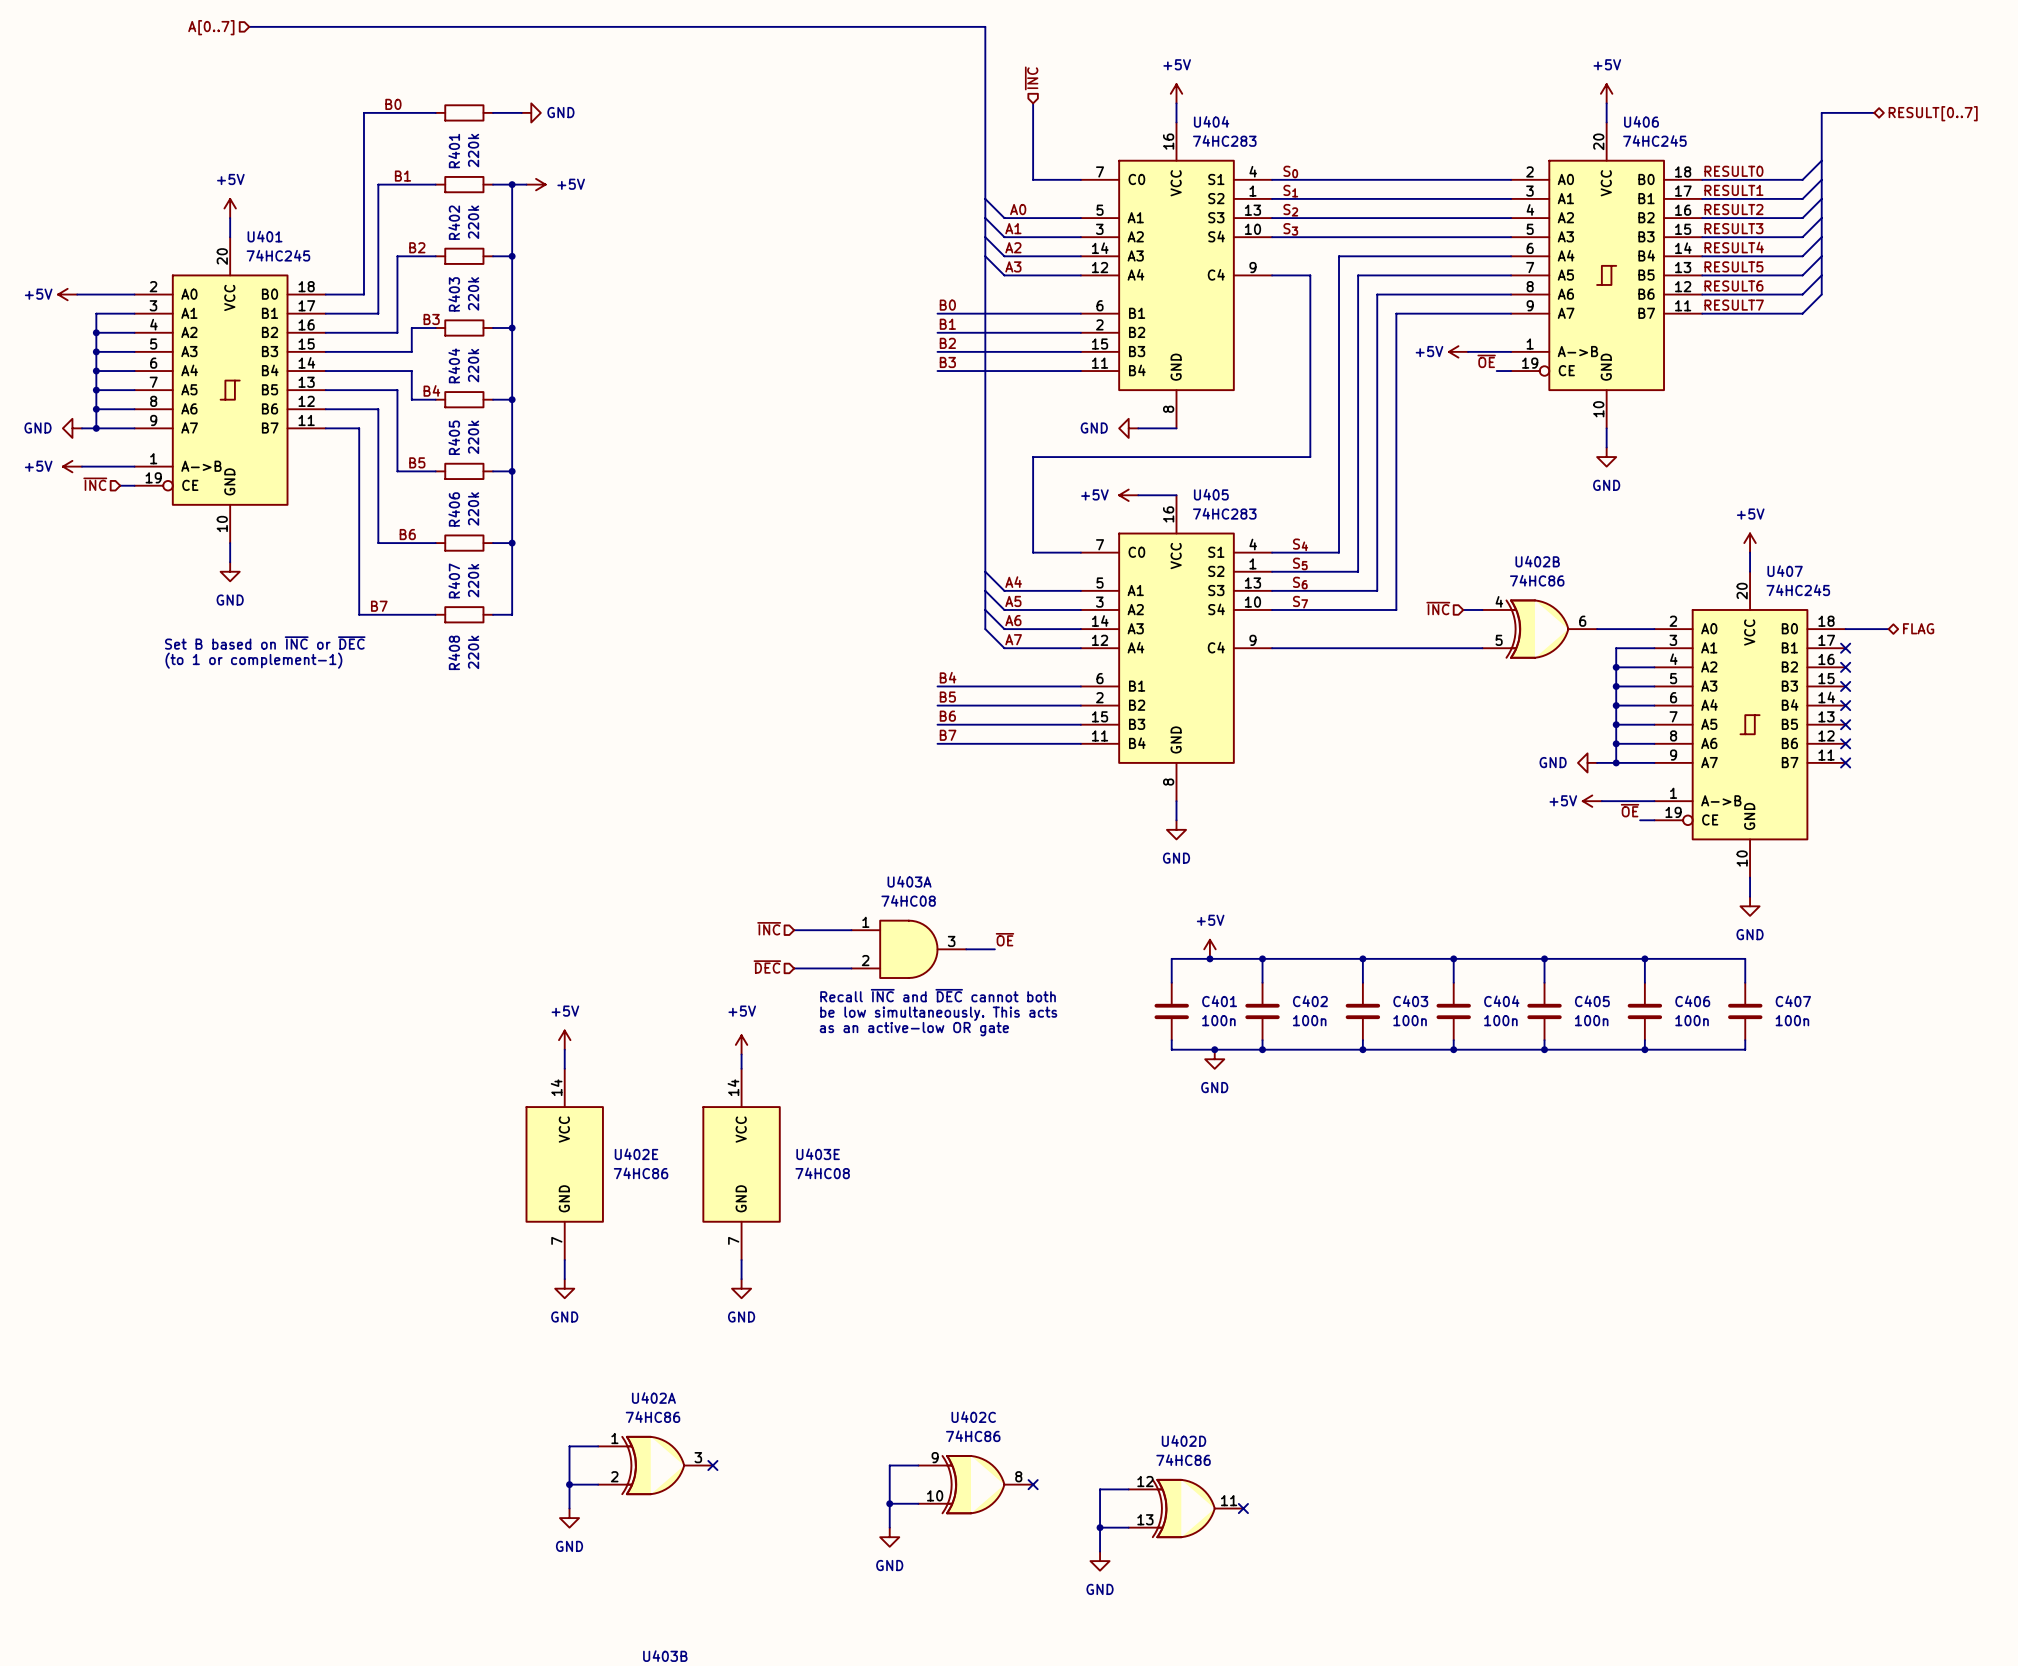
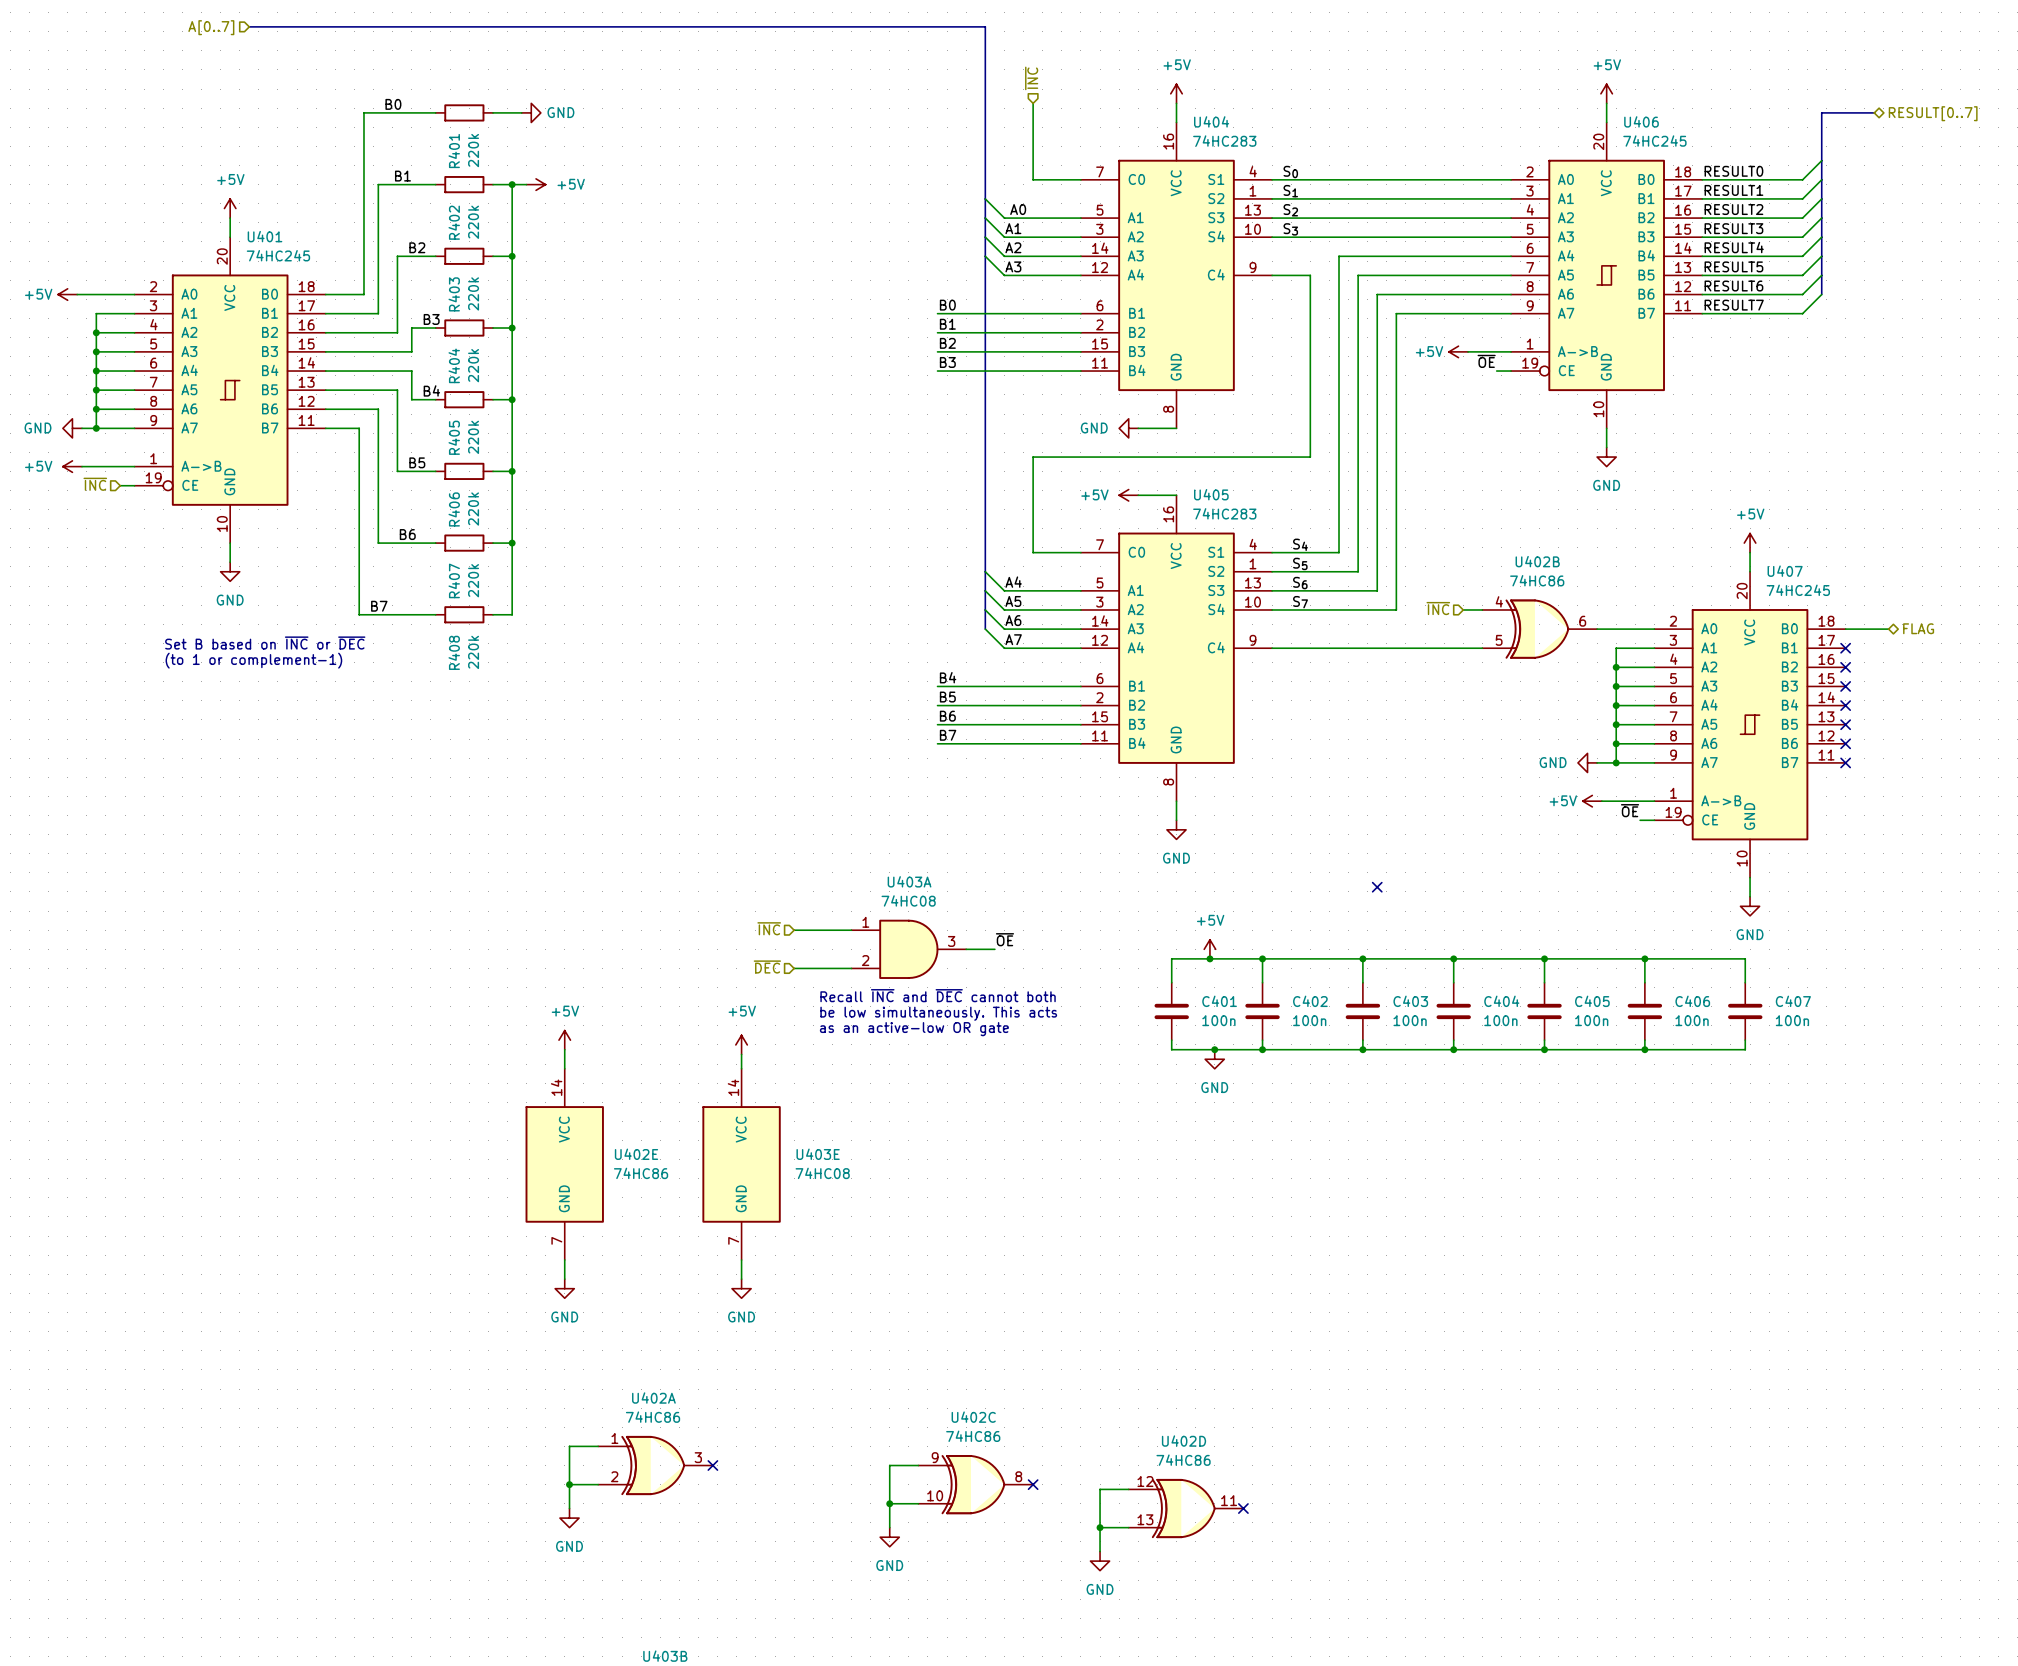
no-connect mark: none -> (1377, 887)

